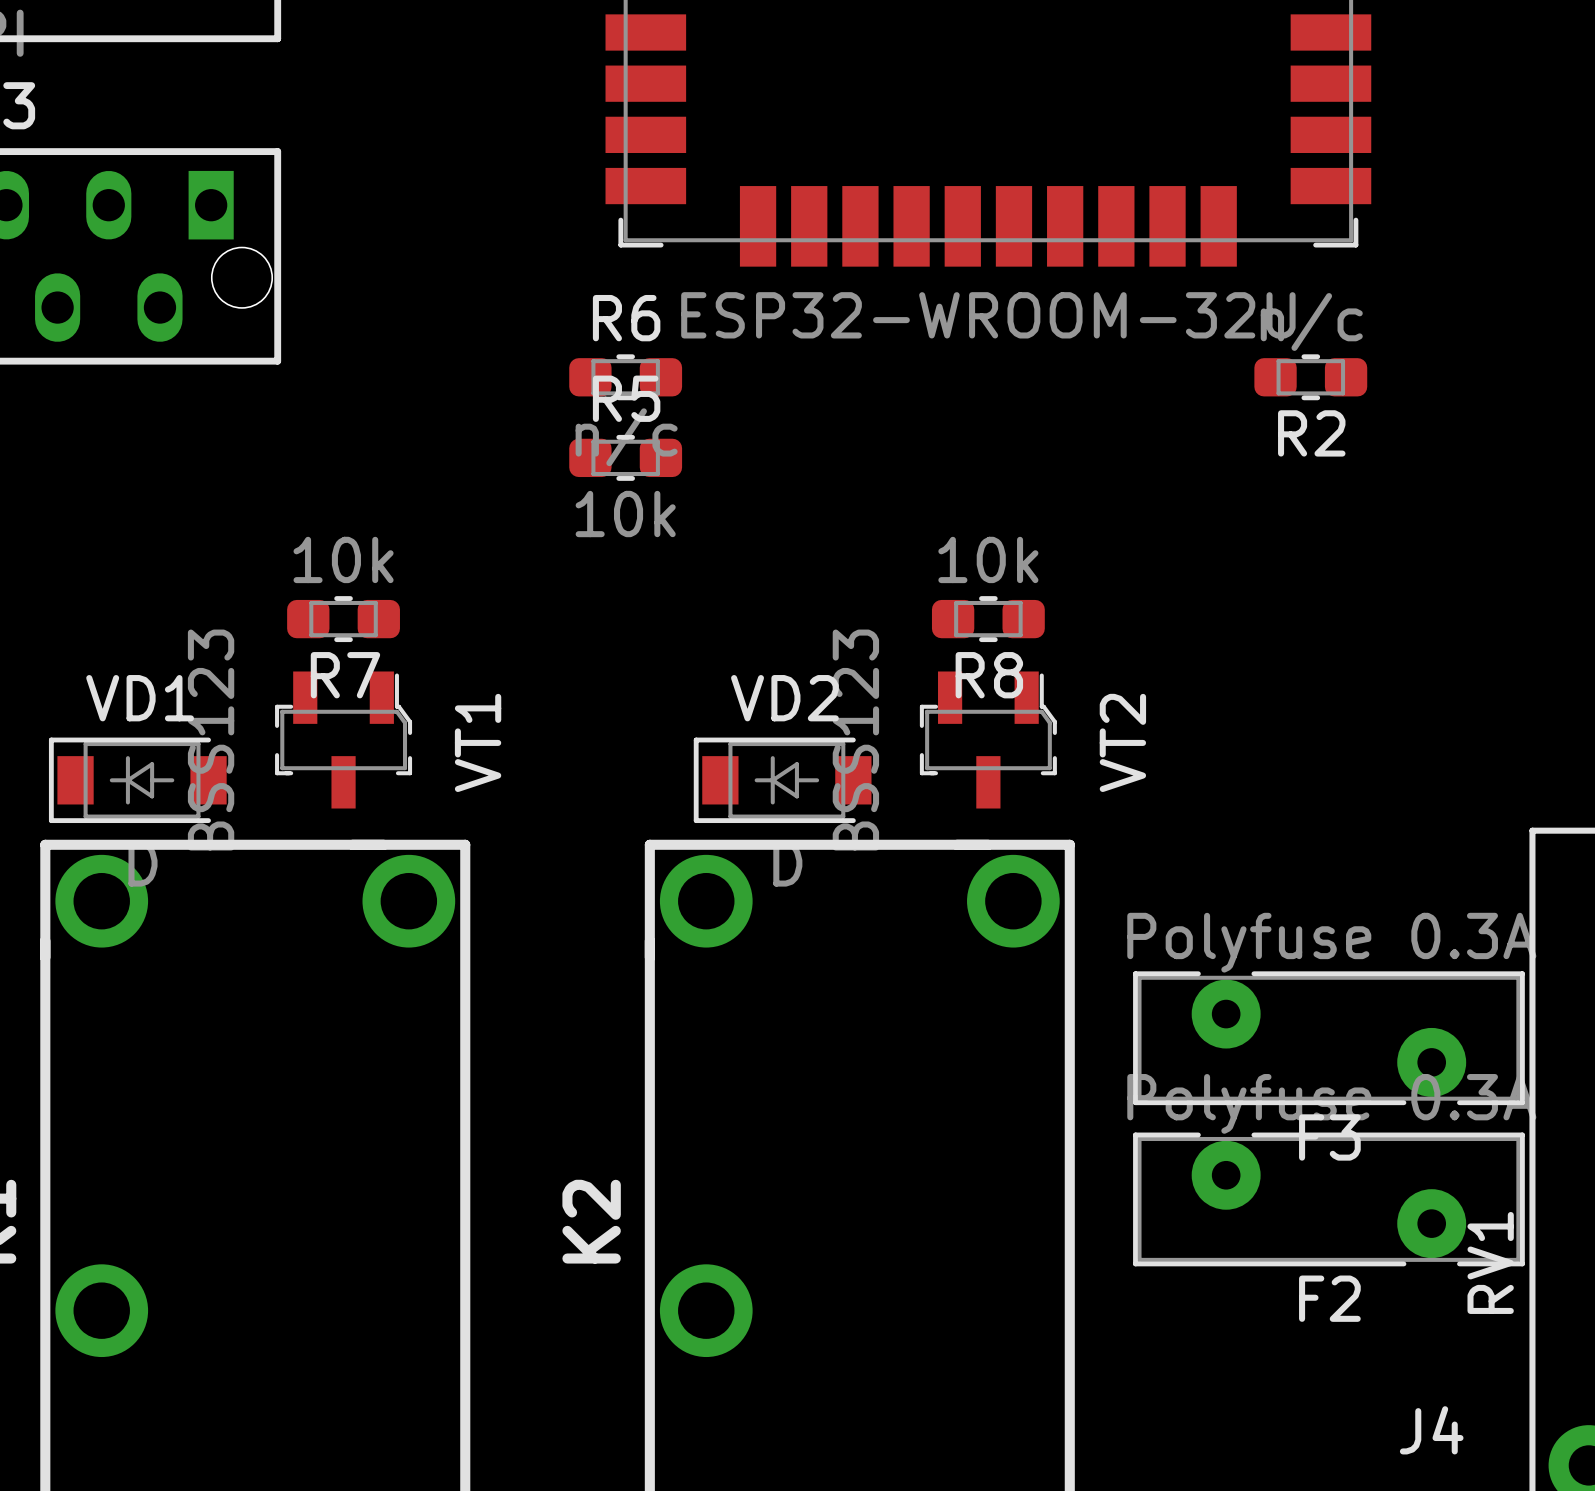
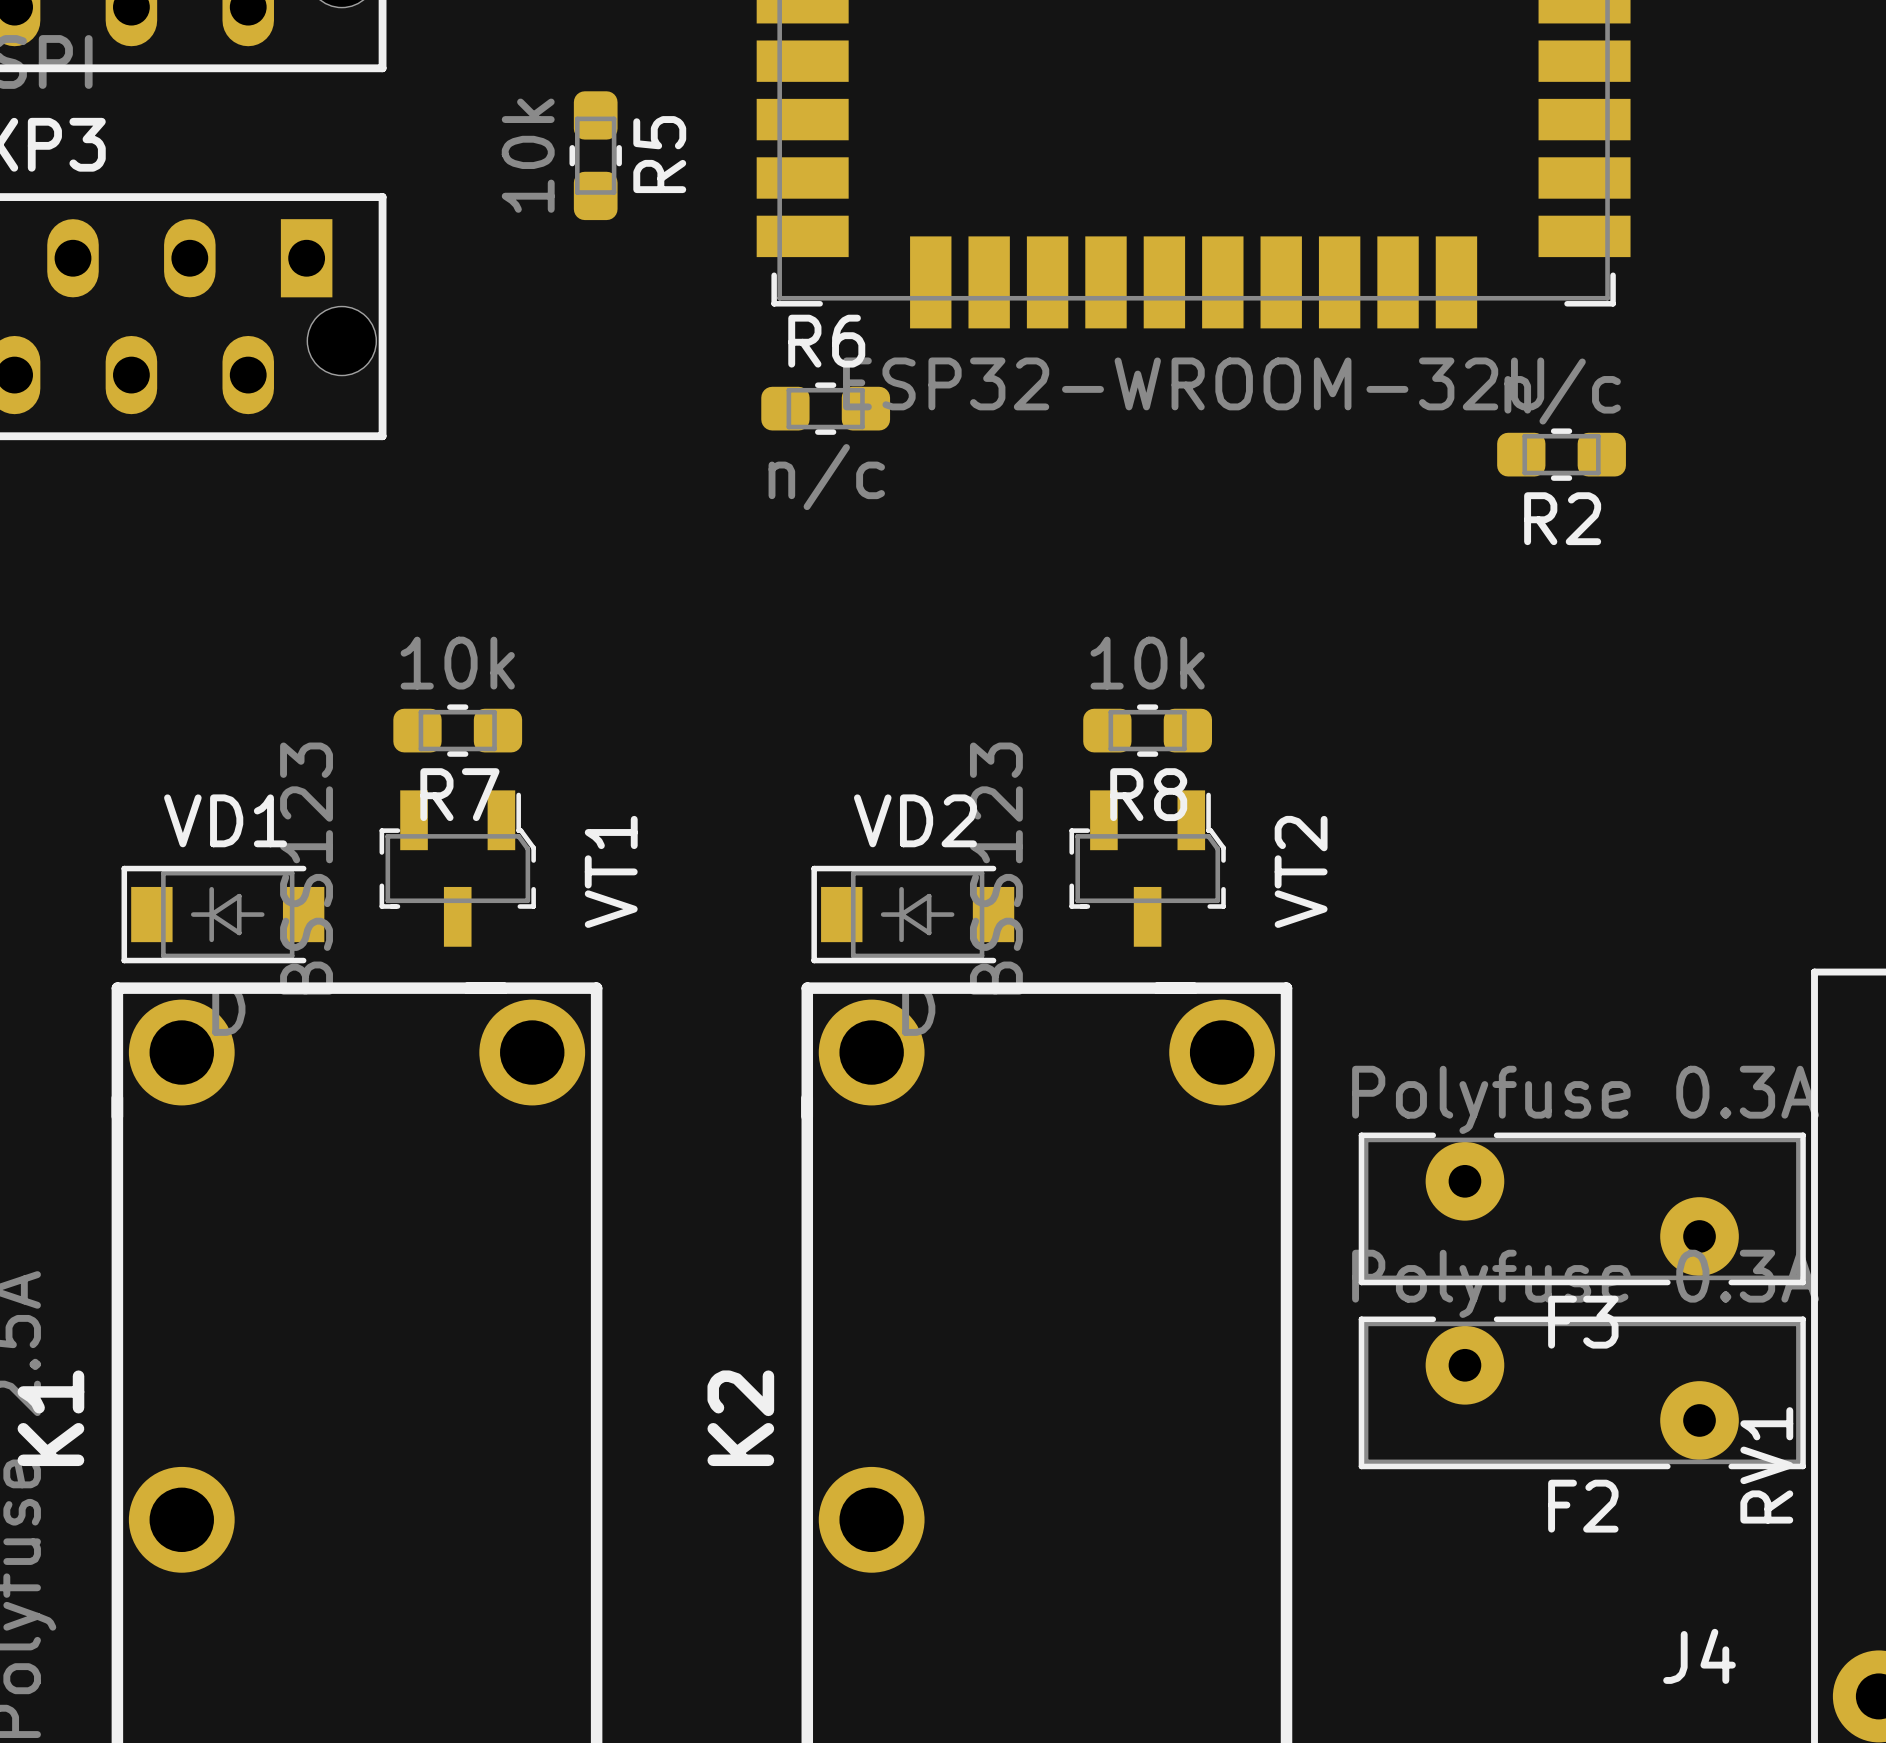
R6 position: (625, 377) -> (825, 408)
R5 rotation: 0° (625, 457) -> 90° clockwise (595, 155)
R5 position: (625, 457) -> (595, 155)
R8 position: (988, 619) -> (1147, 730)
VT2 position: (988, 740) -> (1147, 868)
VD2 position: (782, 780) -> (912, 914)

